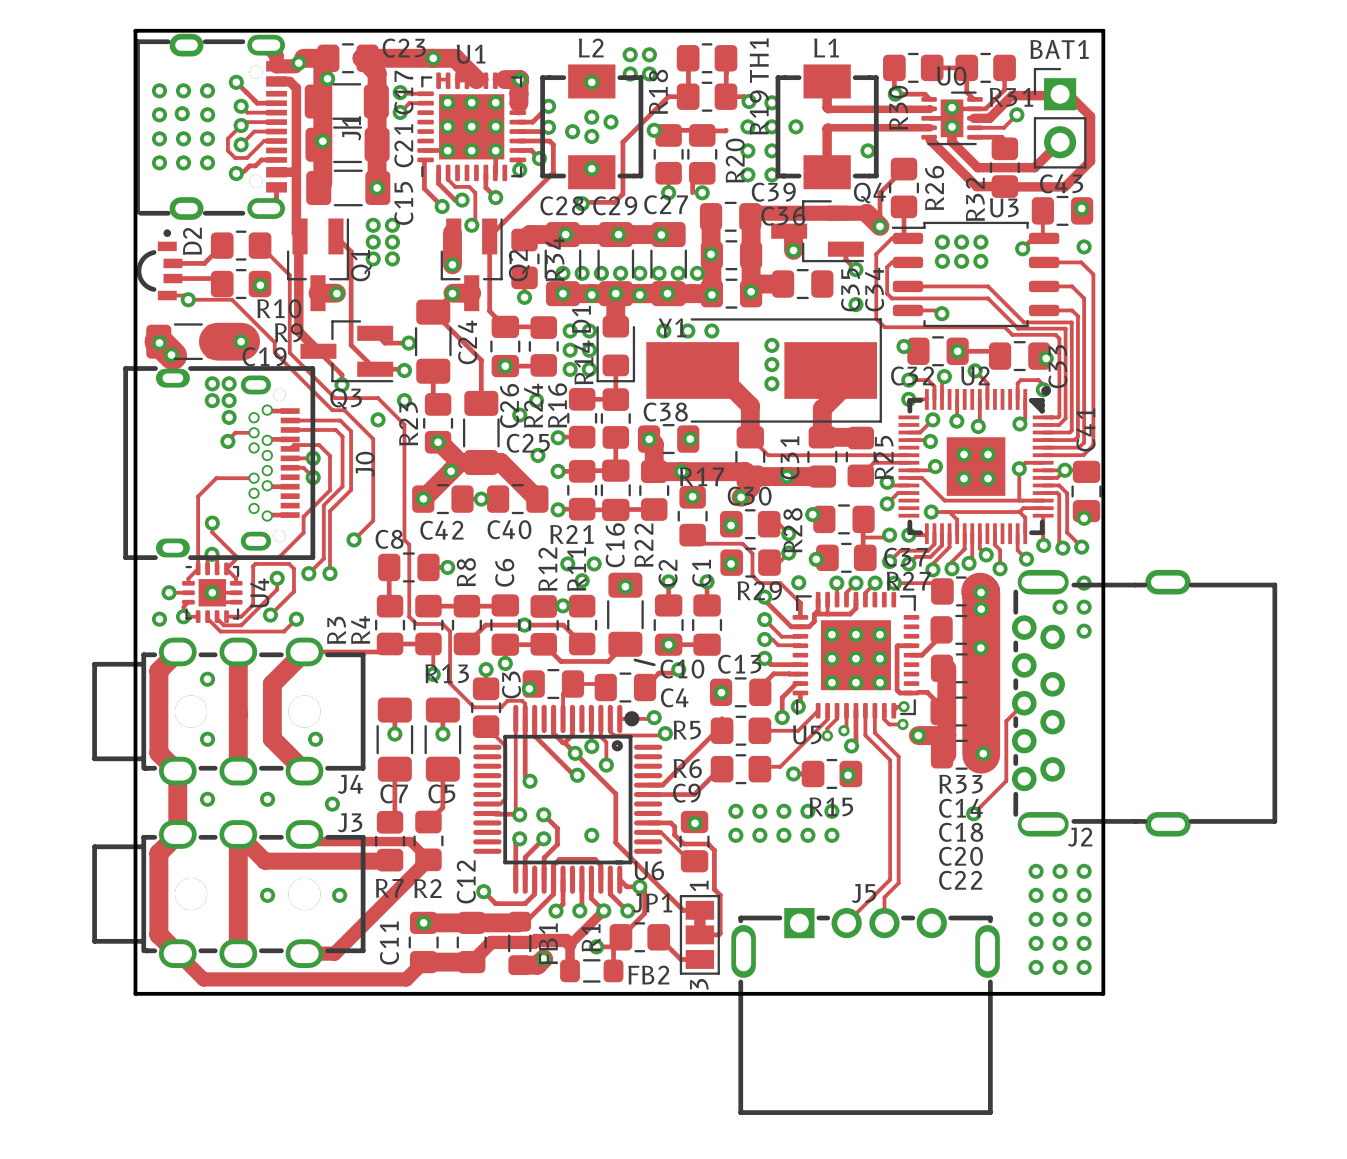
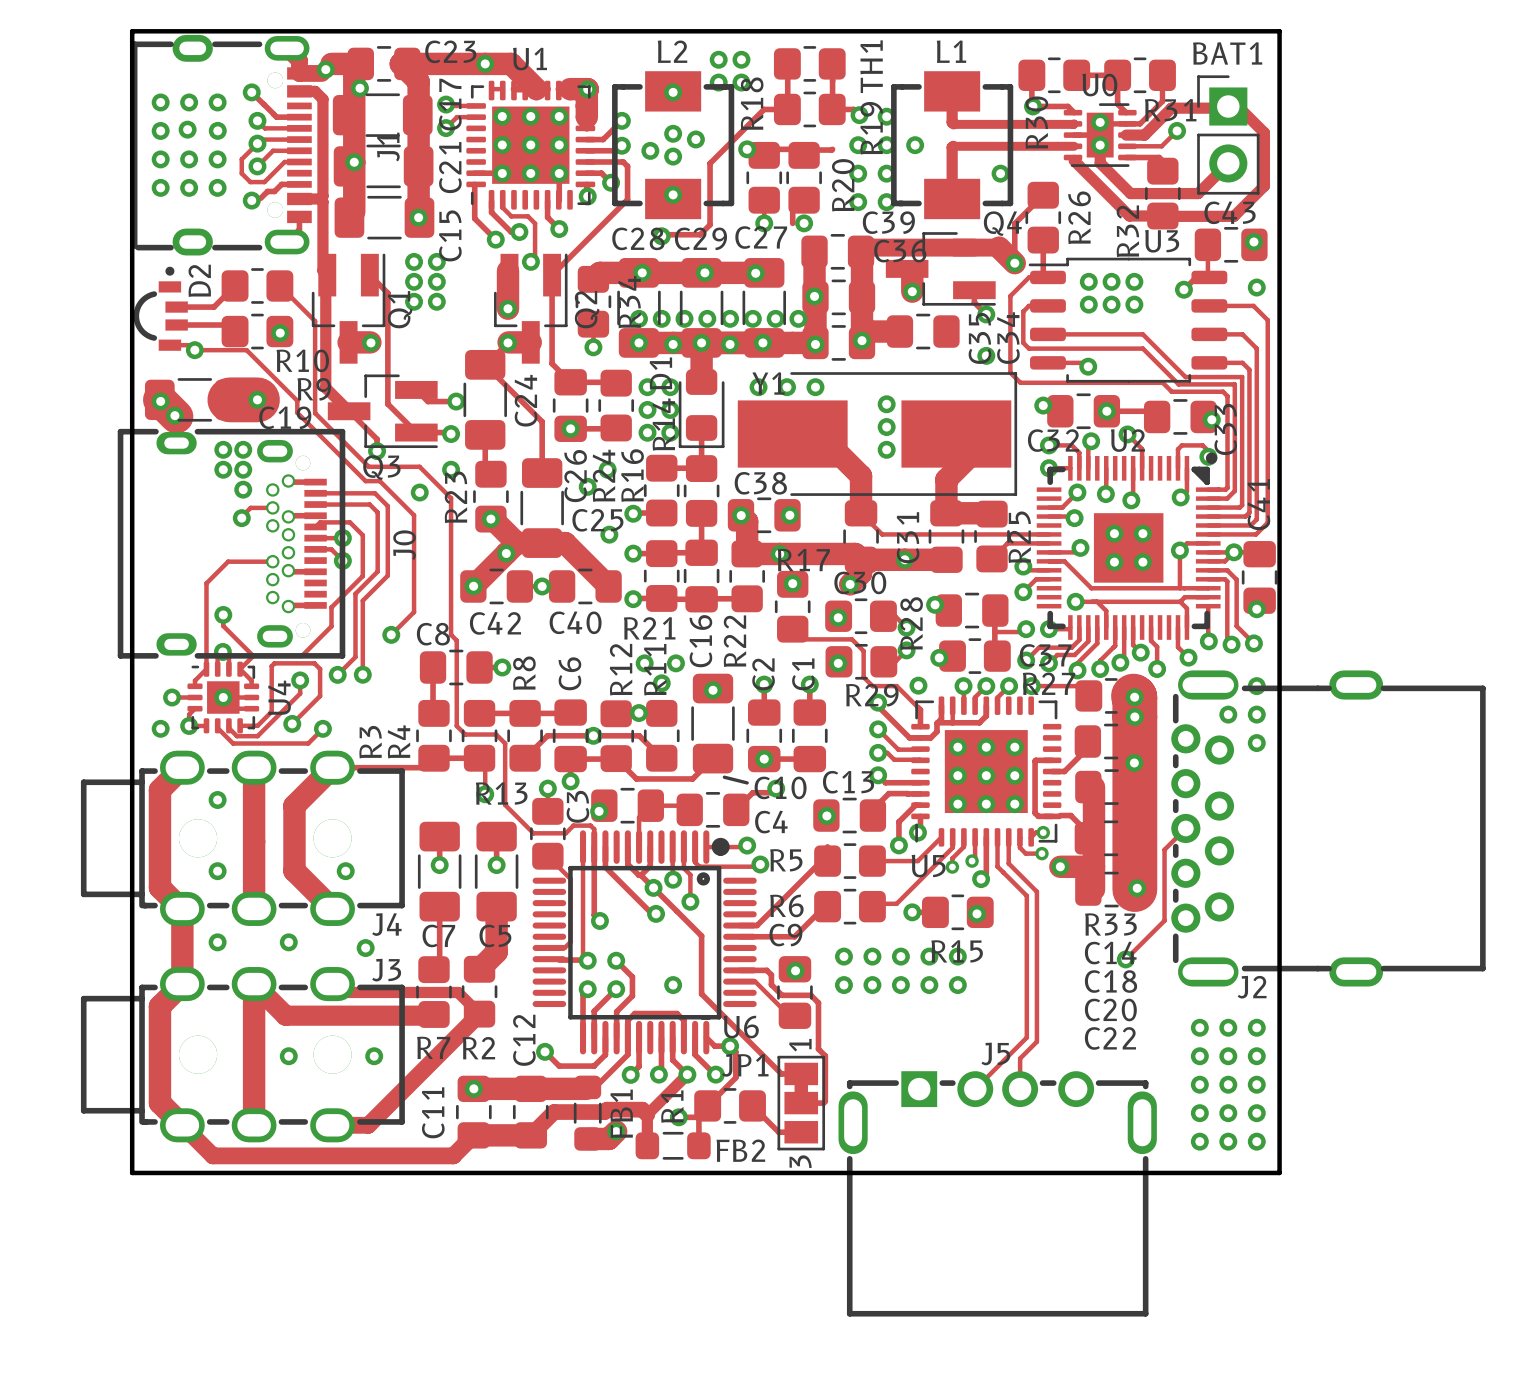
track width: thin (442, 769) (442, 807) (428, 822) -> thick (496, 906) (496, 952) (479, 969)

